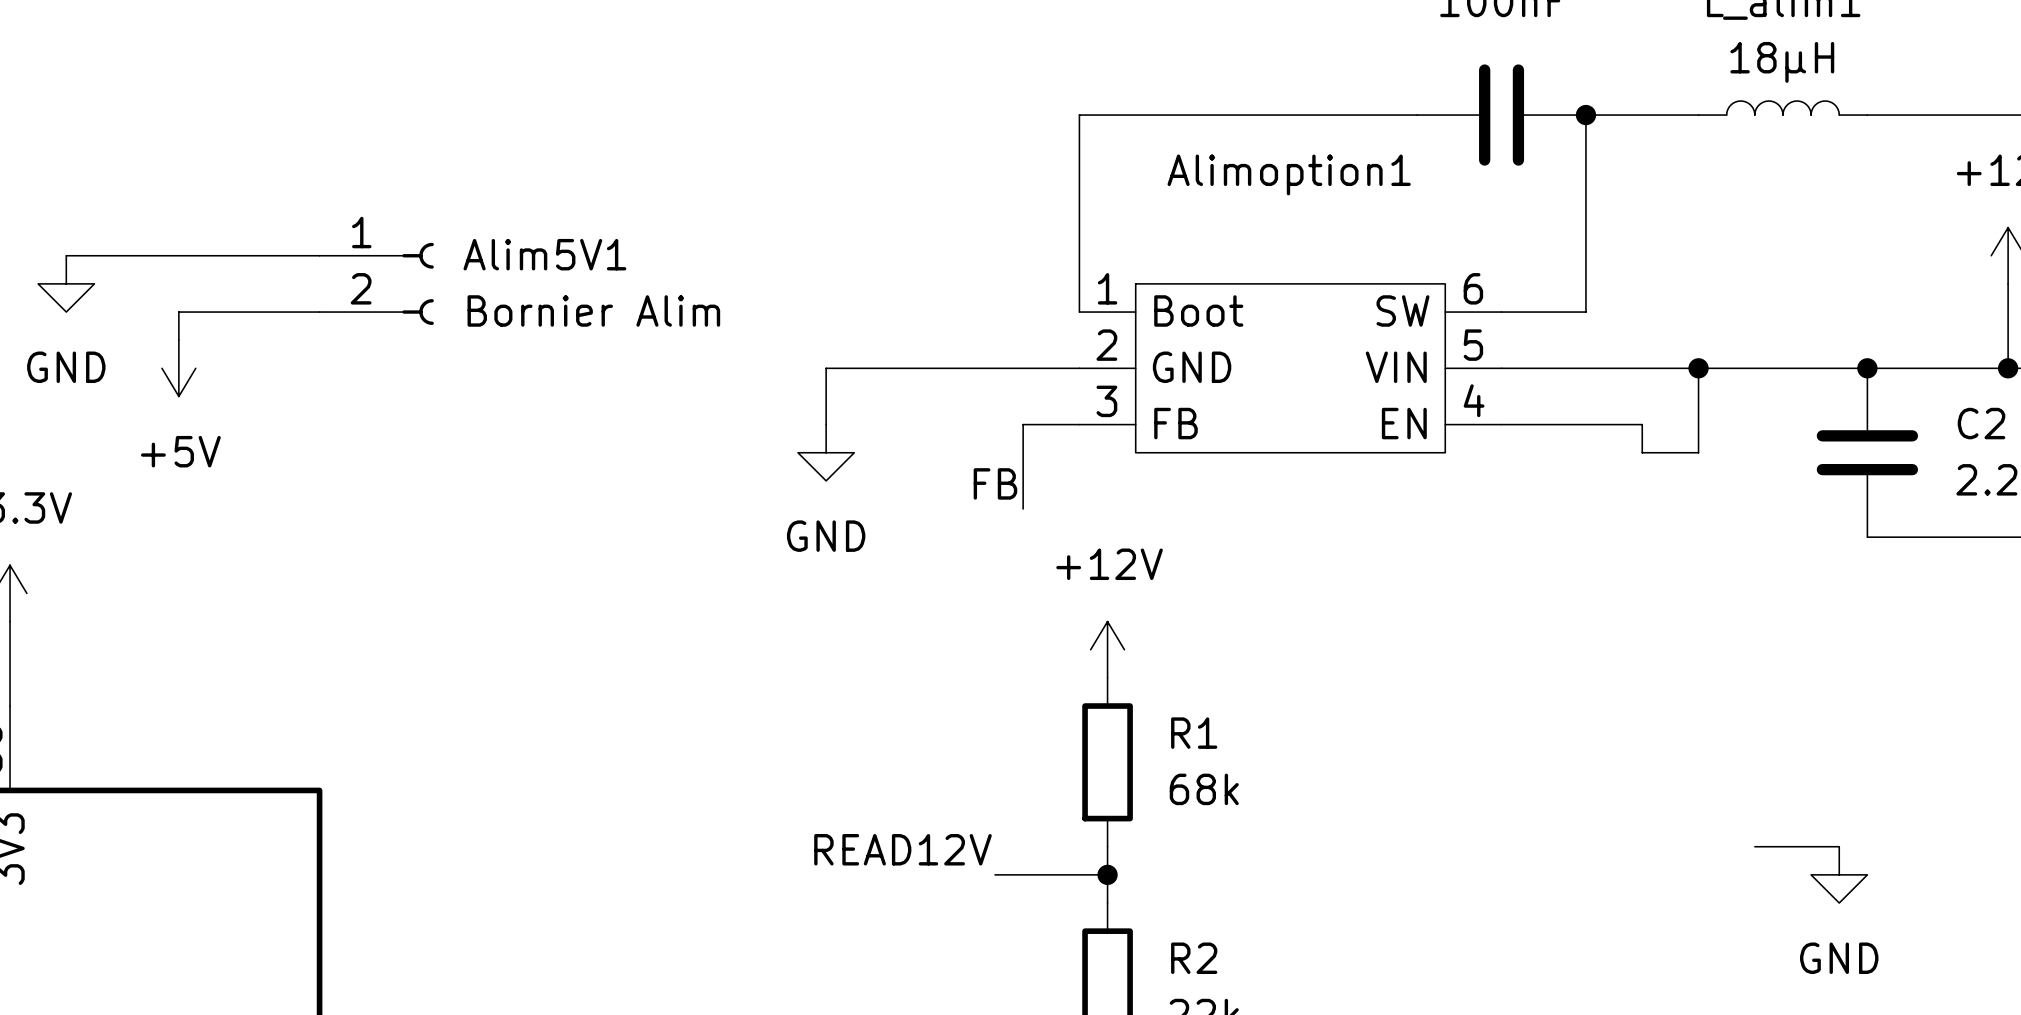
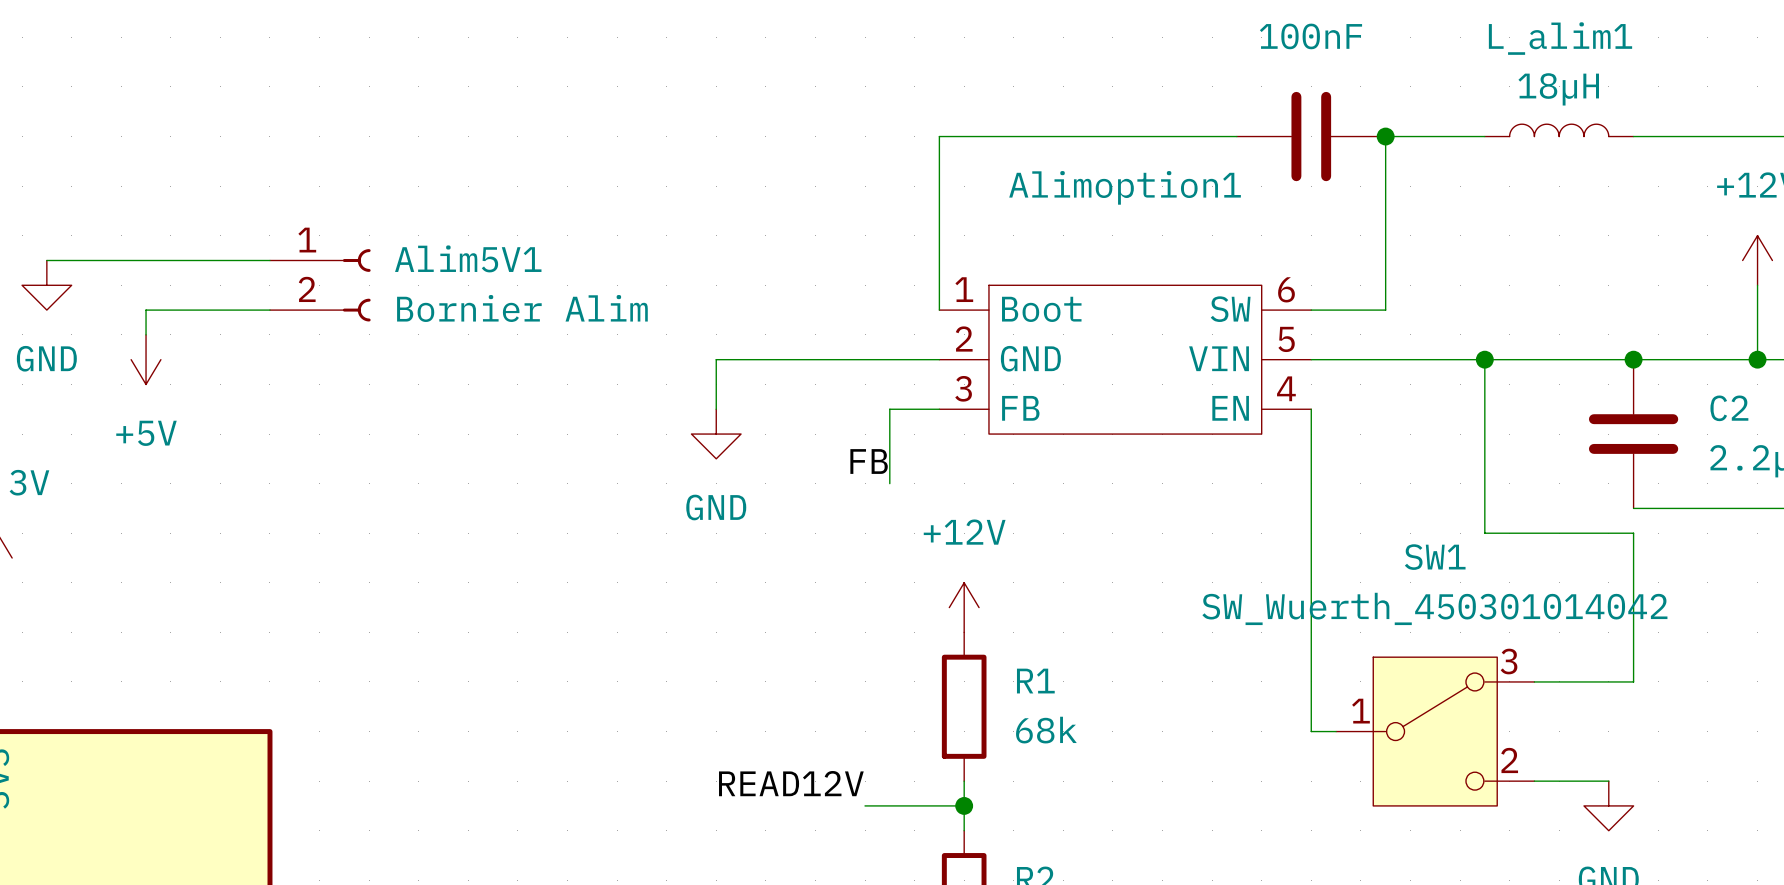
wire: (1501, 424) (1642, 424) (1642, 452) (1698, 452) -> (1311, 409) (1311, 731) (1336, 731)
wire: none -> (1484, 434) (1484, 533) (1633, 533) (1633, 681) (1534, 681)
SW1: none -> SW_Wuerth_450301014042 (1435, 731)

